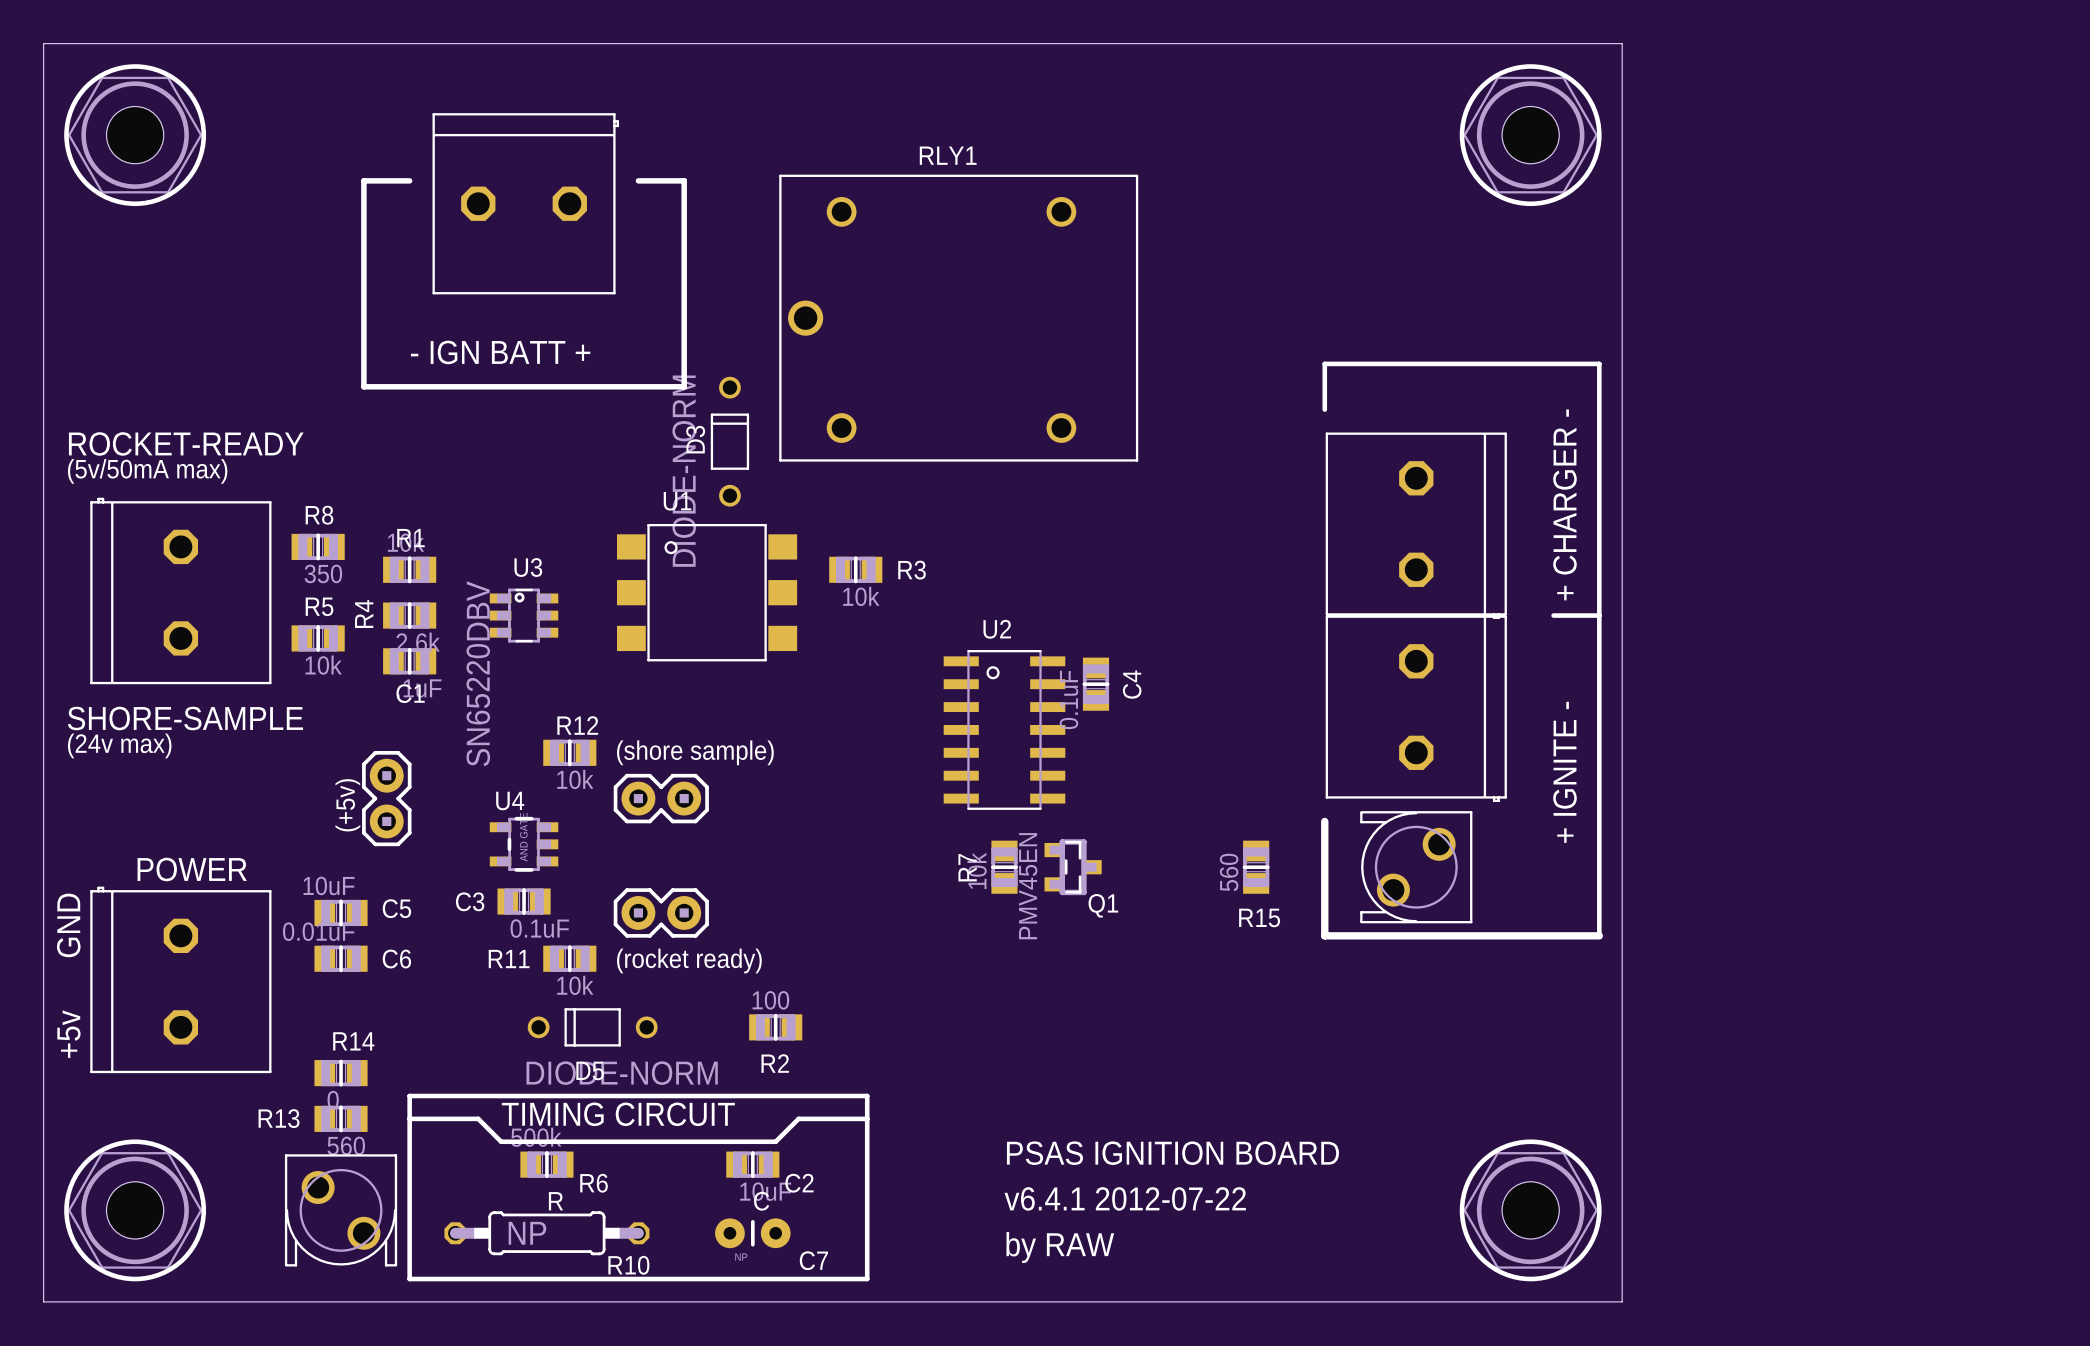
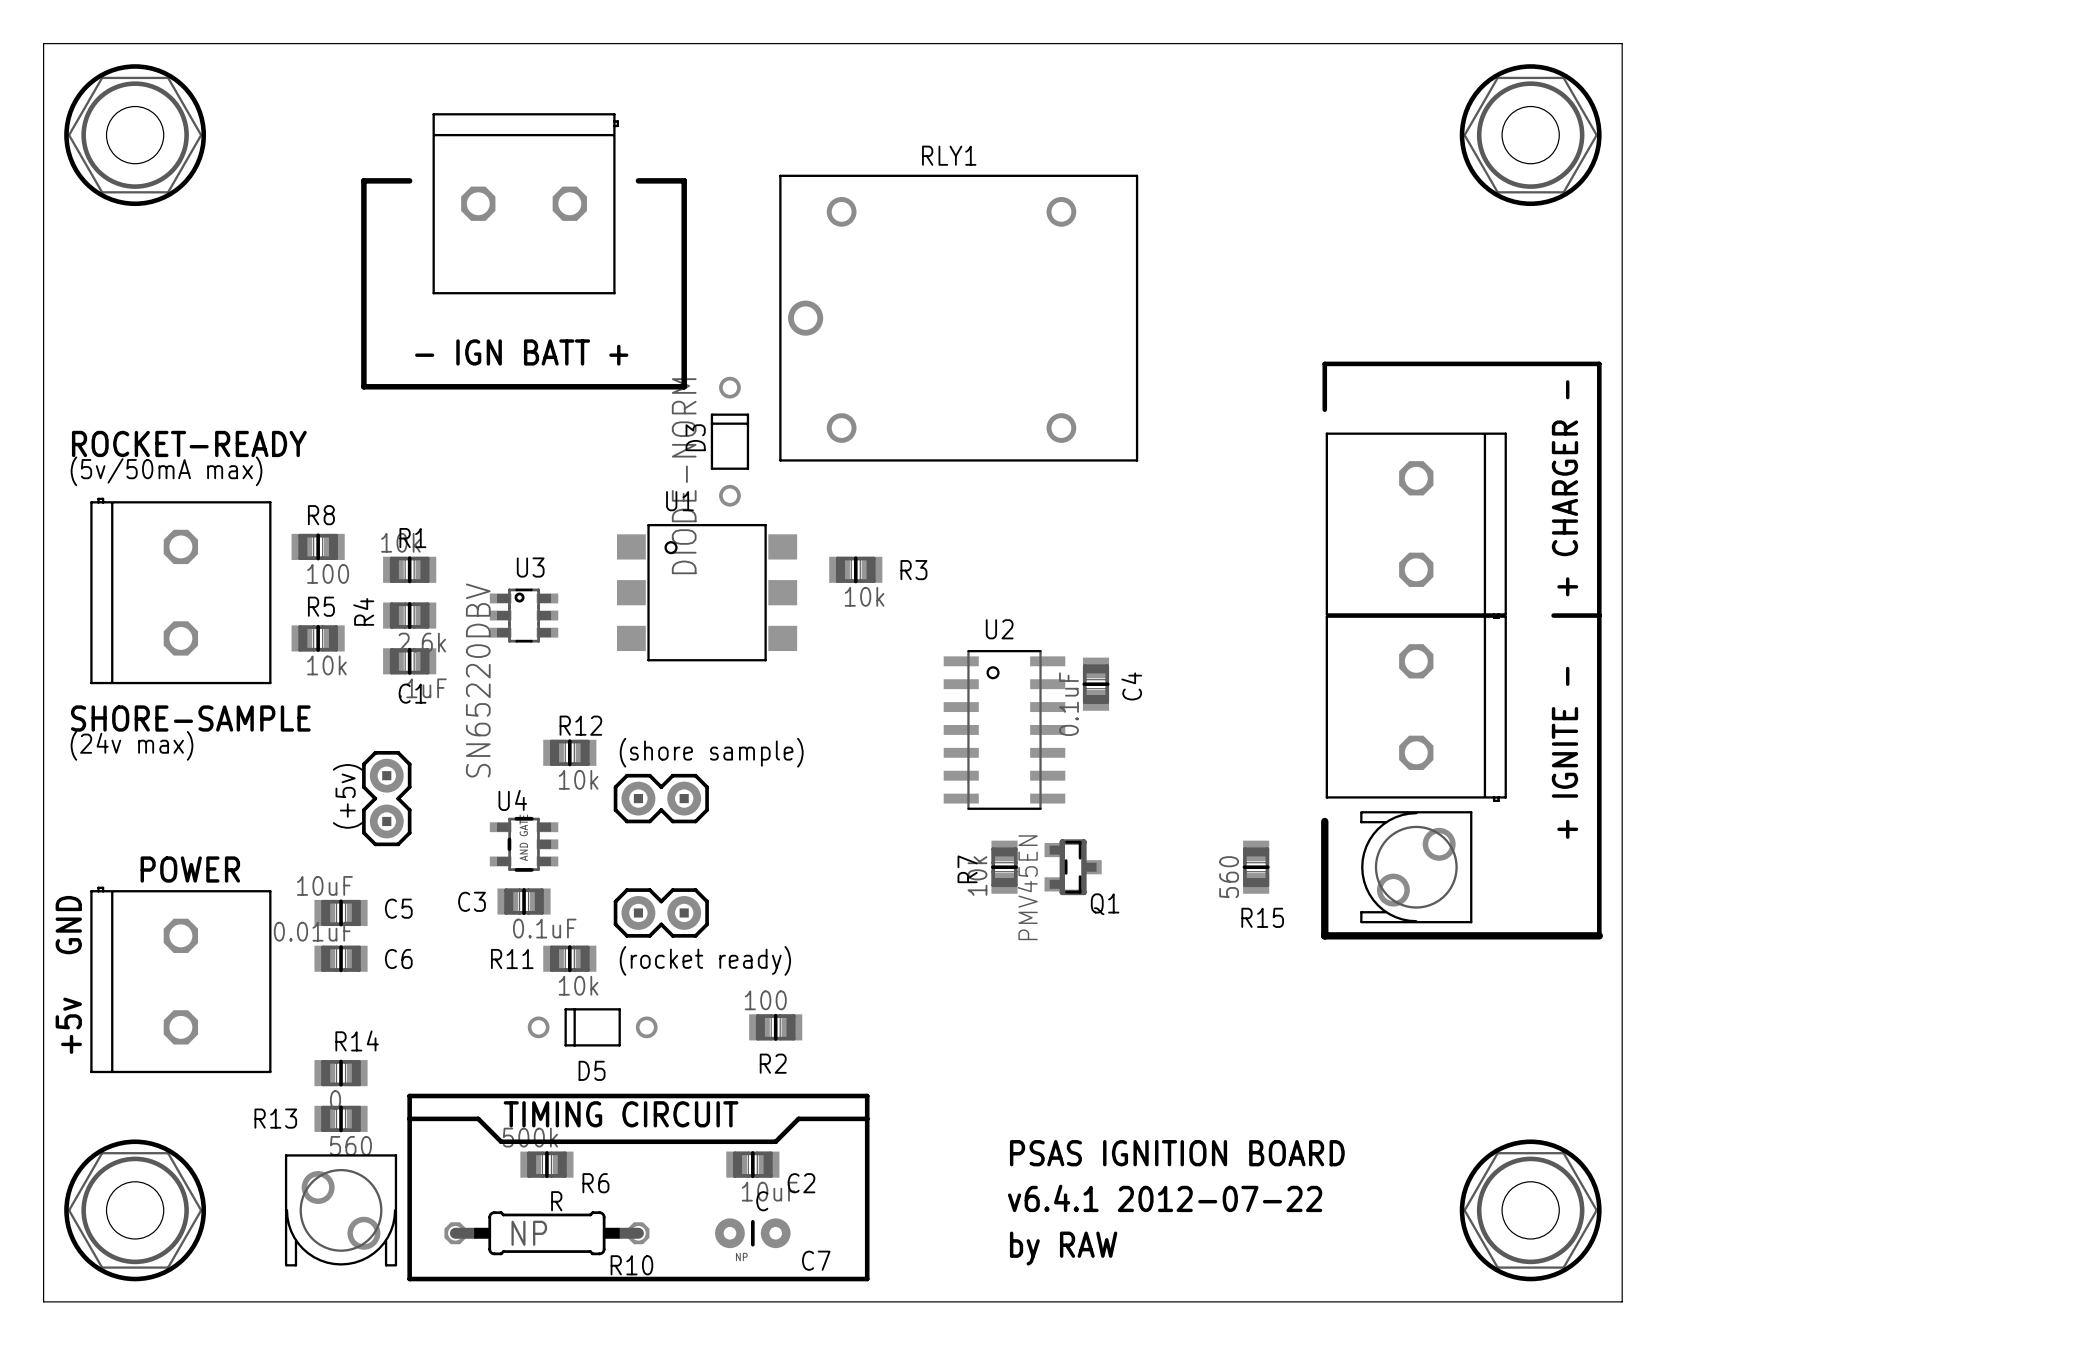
R8 value: 350 (323, 573) -> 100 (328, 573)
D5 value: DIODE-NORM (622, 1073) -> none

